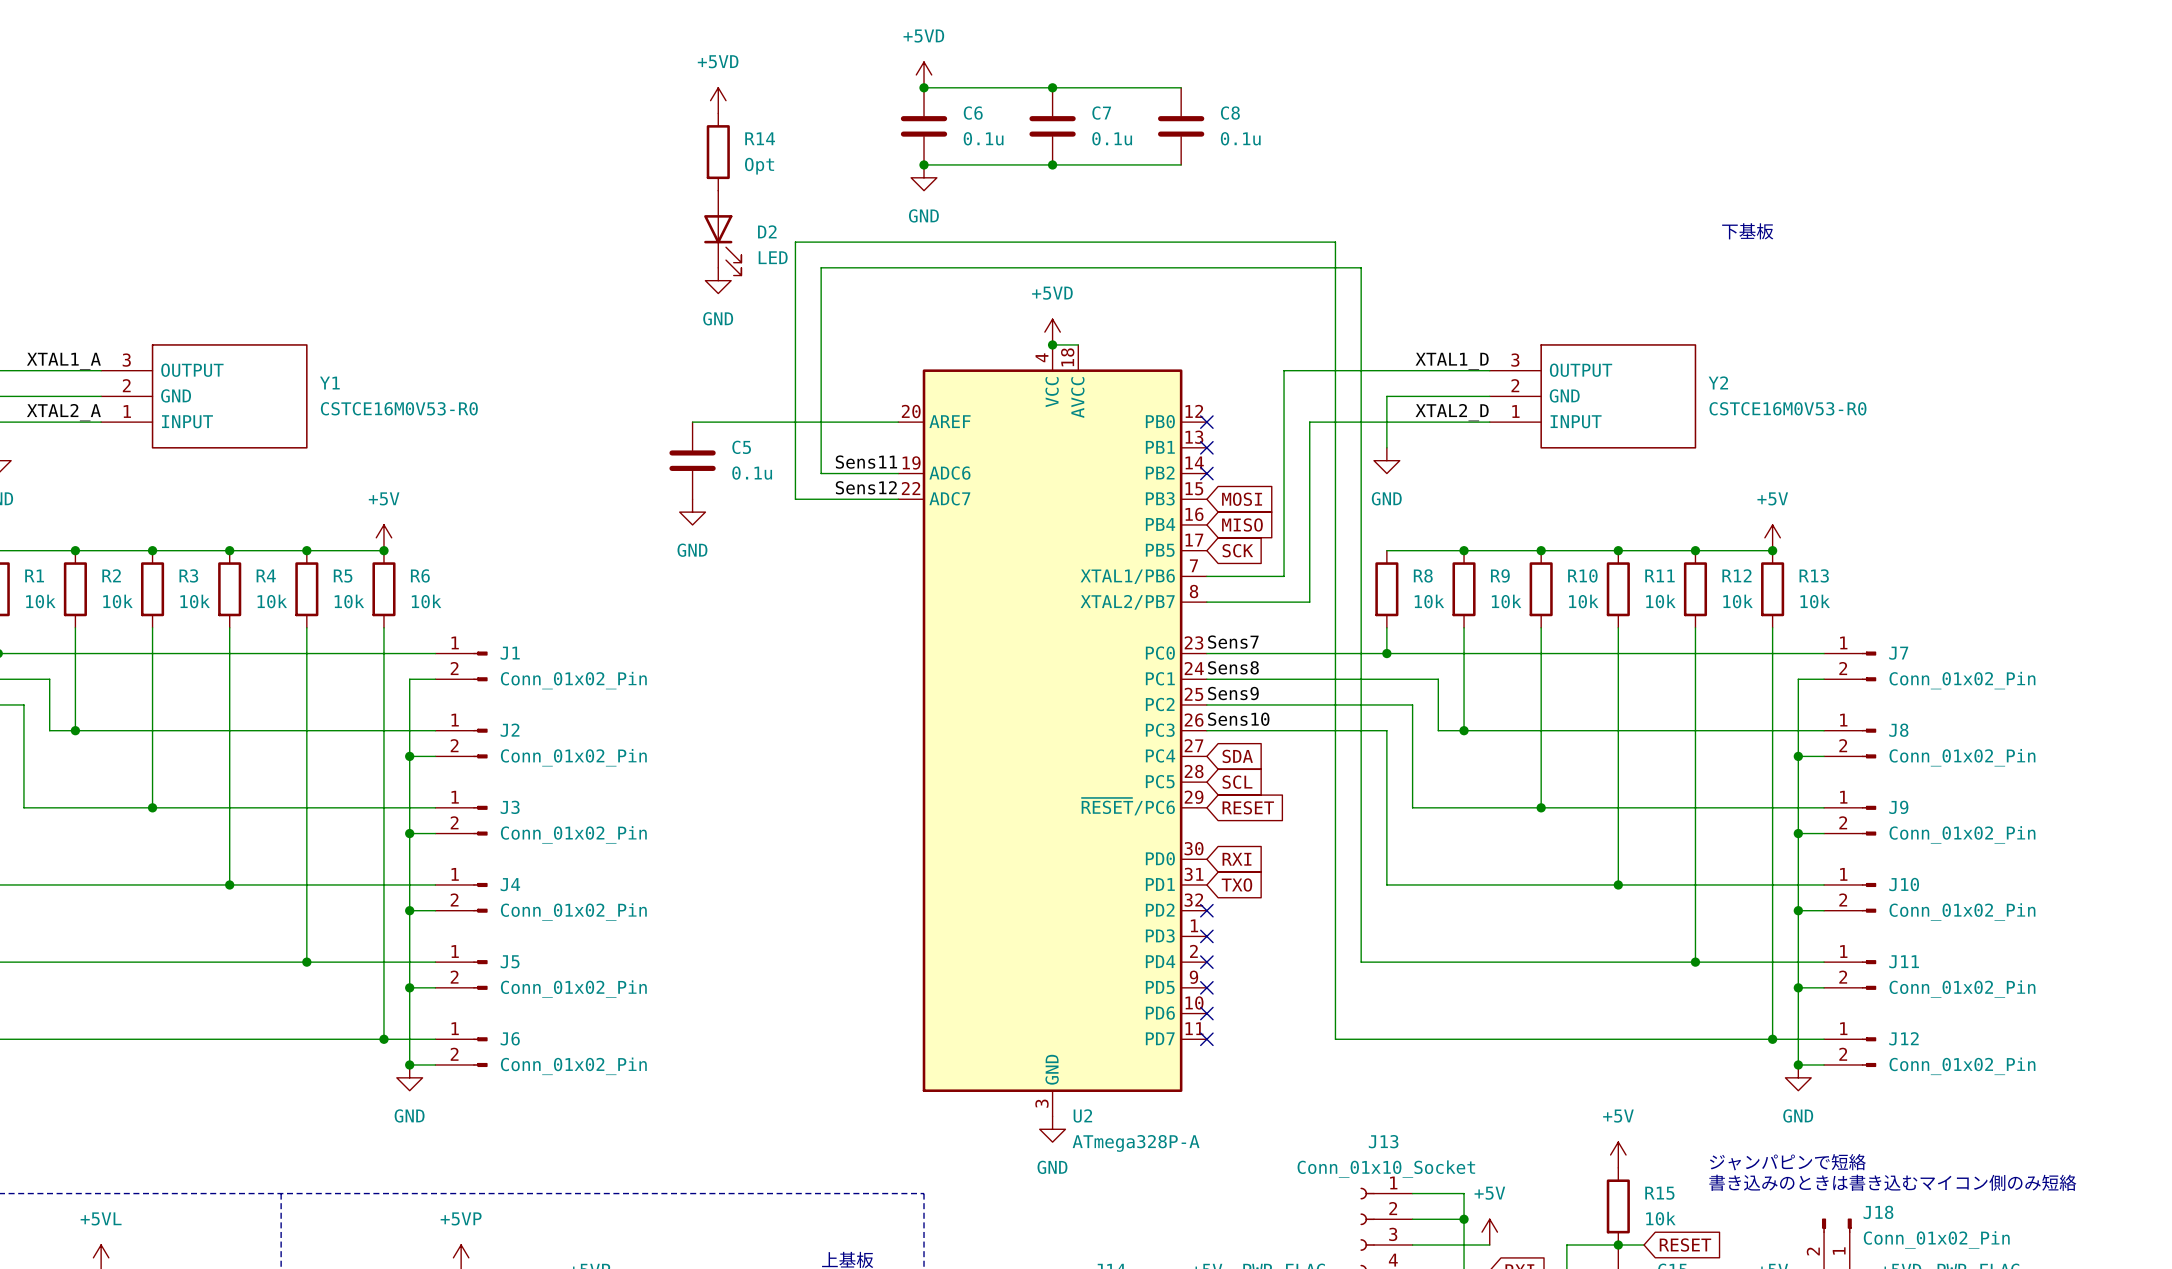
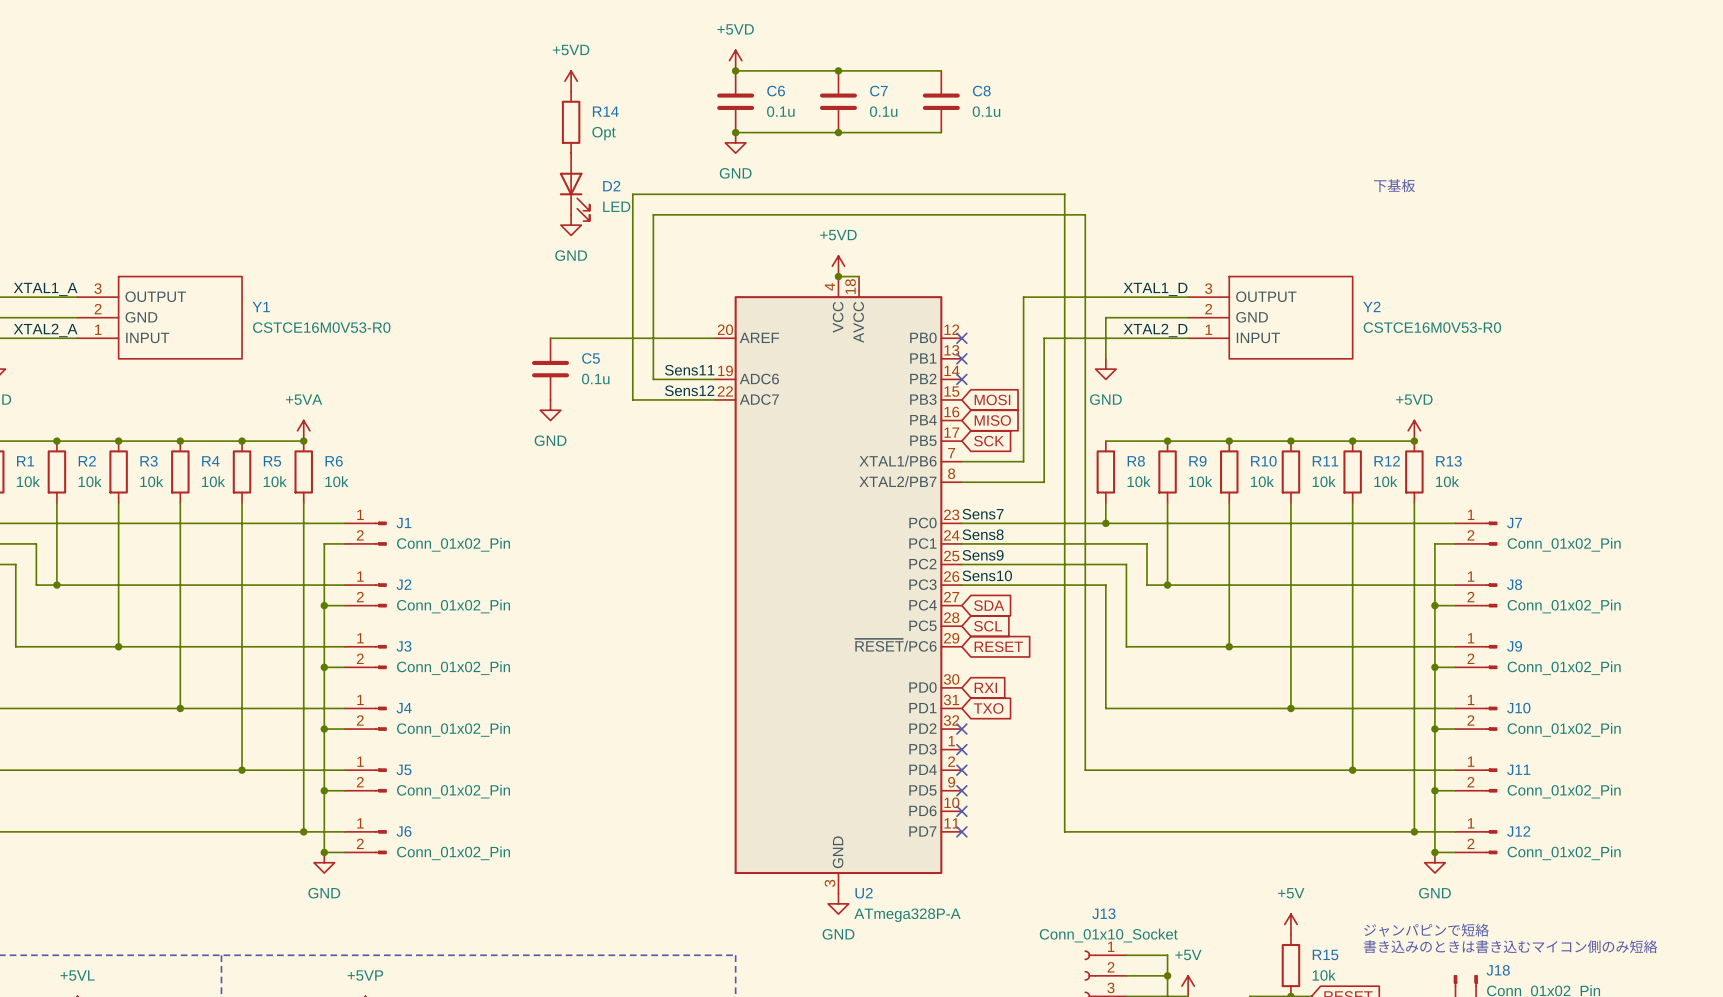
power symbol: +5V (383, 537) -> +5VA (303, 430)
power symbol: +5V (1772, 537) -> +5VD (1414, 430)

